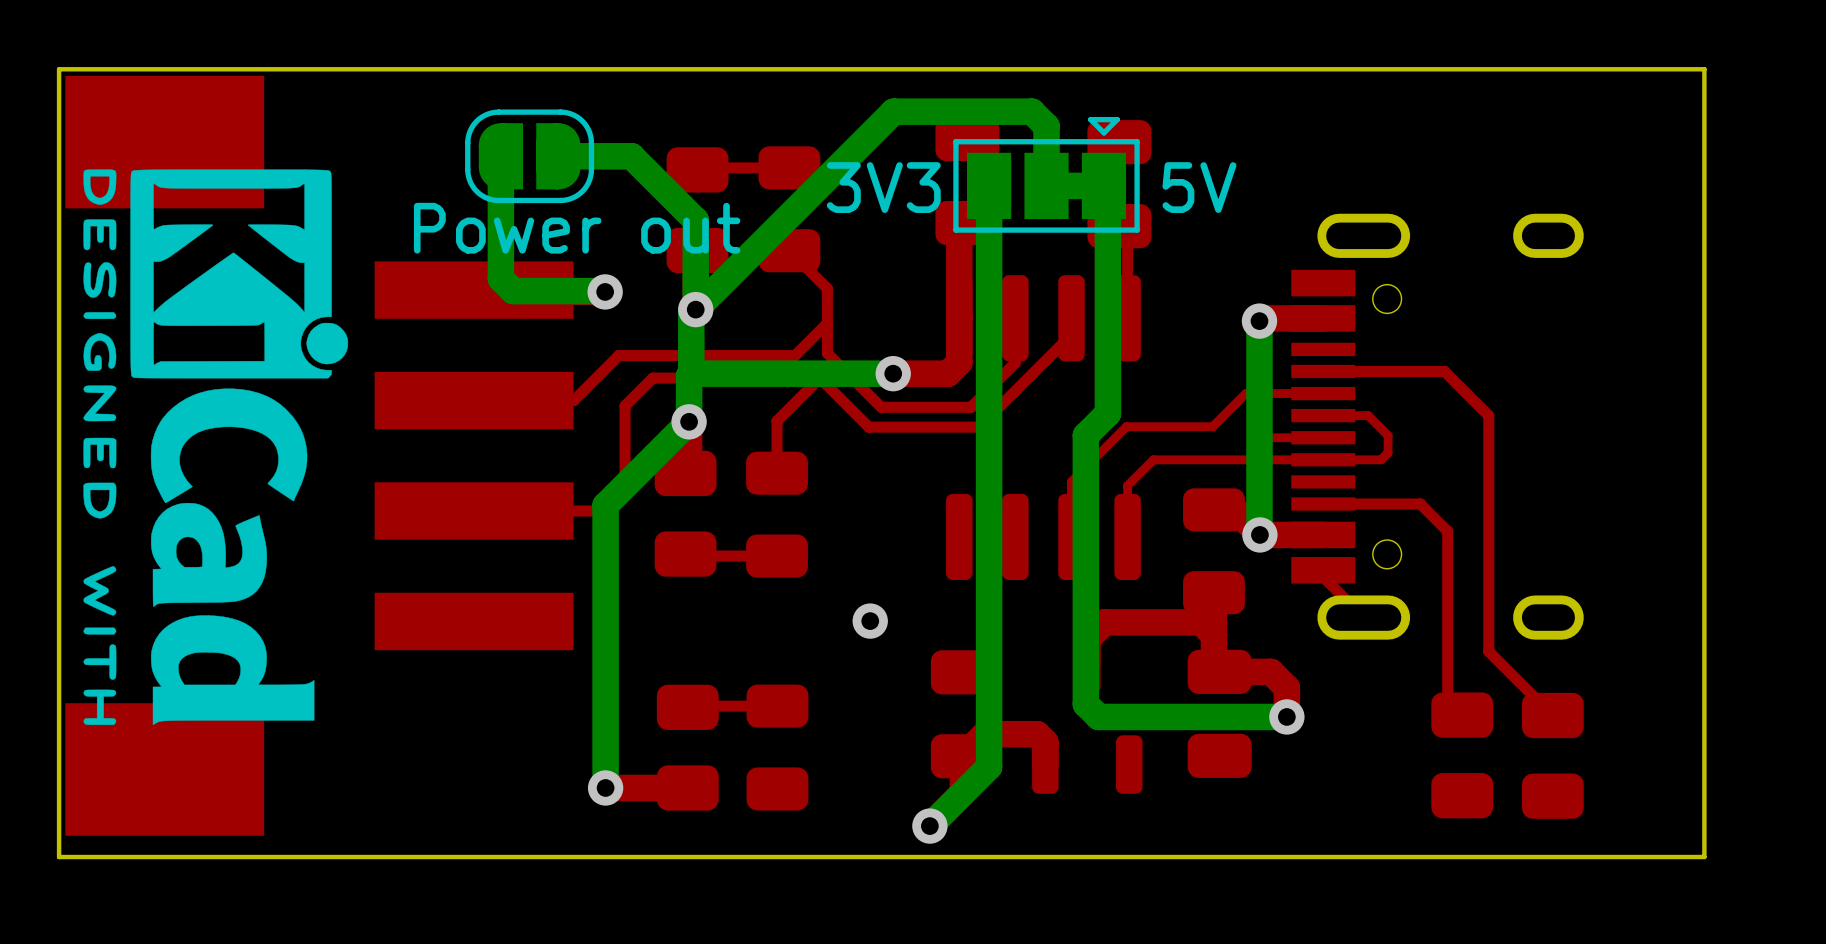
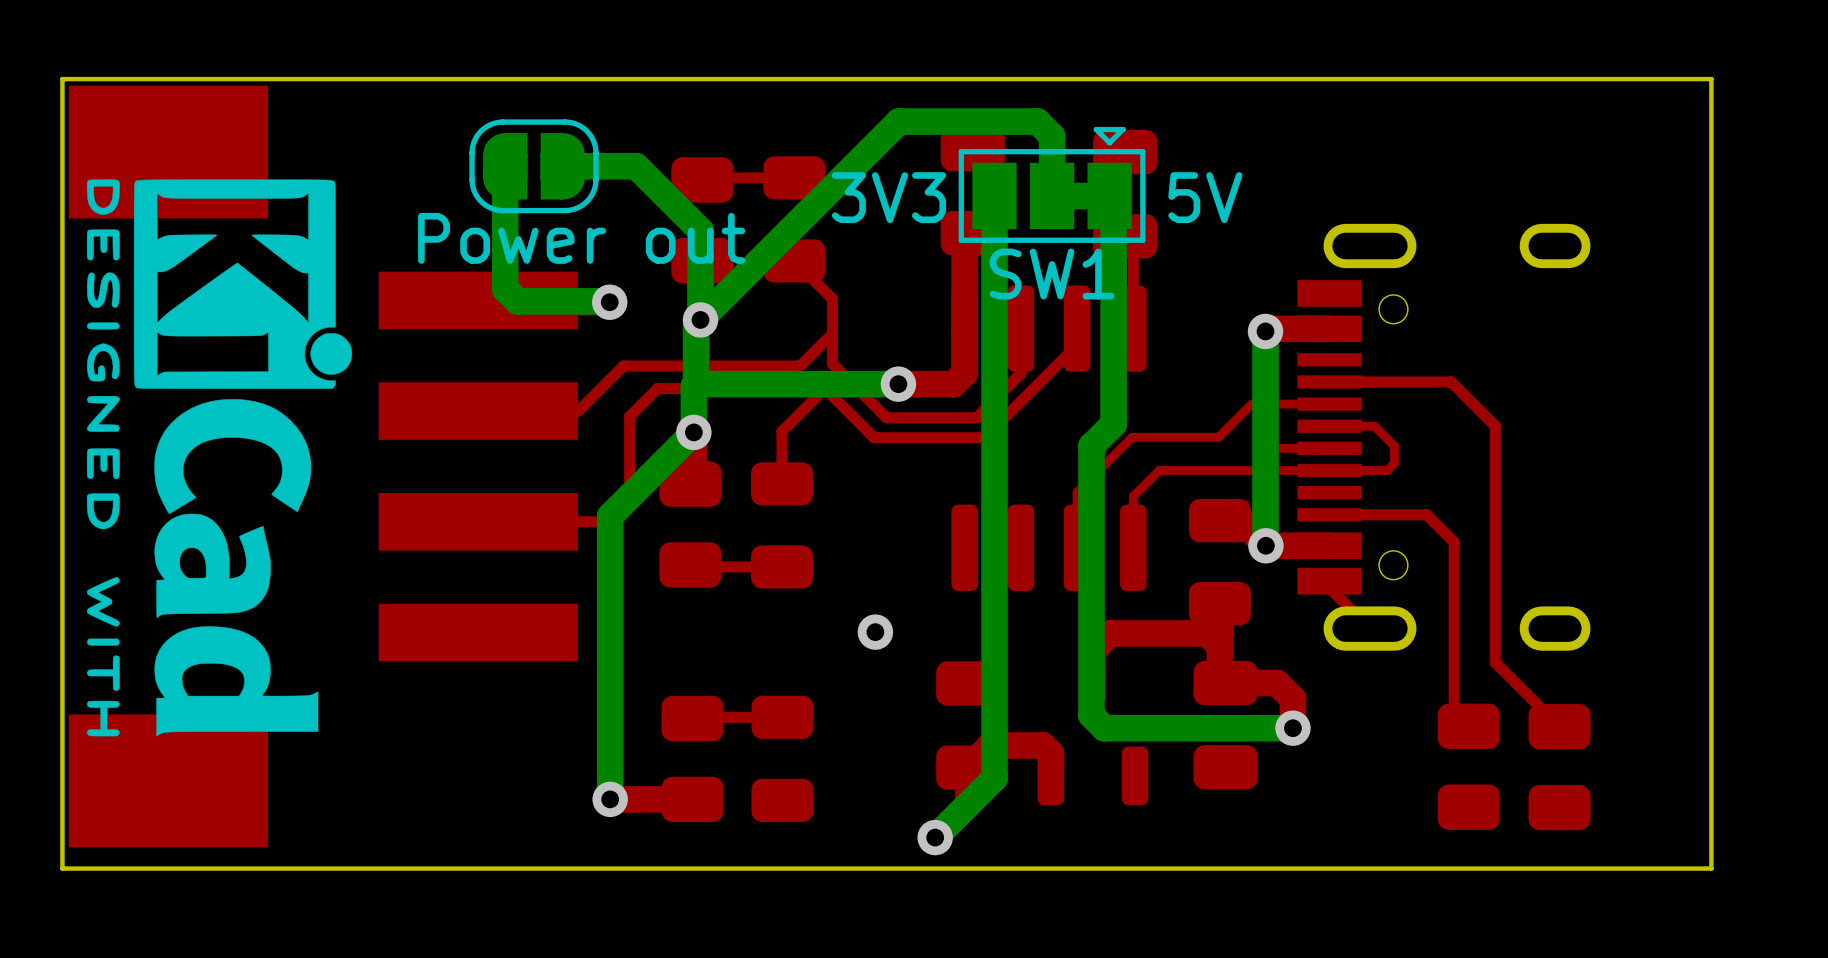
SW1 name: none -> SW1 (1052, 274)

